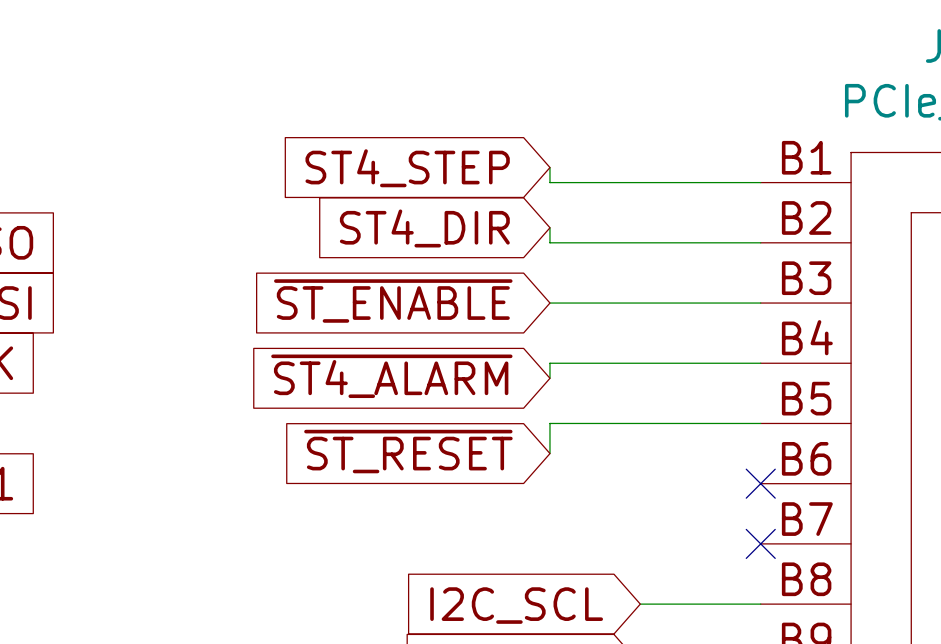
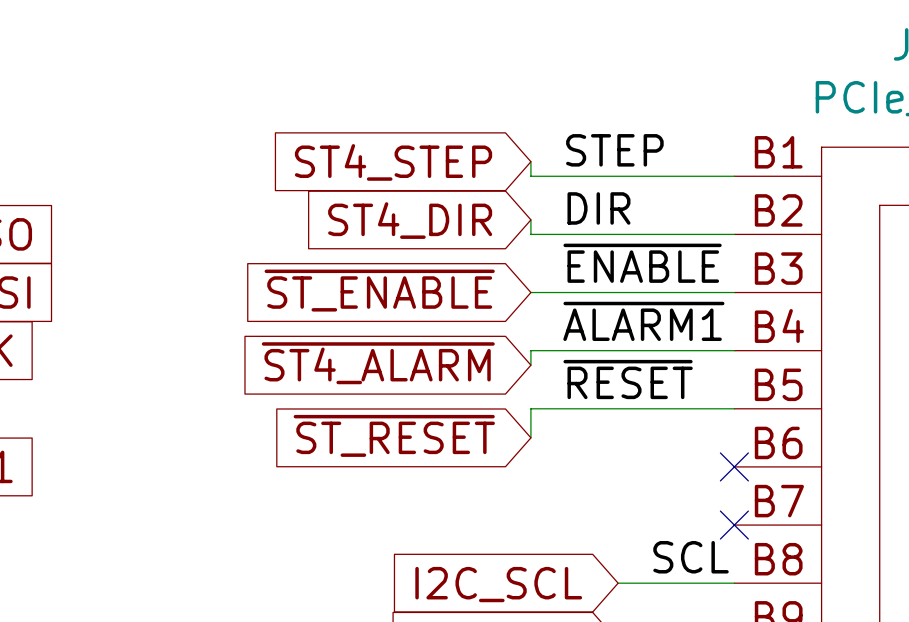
label: none -> STEP (614, 150)
label: none -> DIR (598, 208)
label: none -> ~{ENABLE} (642, 263)
label: none -> ~{ALARM1} (643, 321)
label: none -> ~{RESET} (628, 379)
label: none -> SCL (691, 557)

